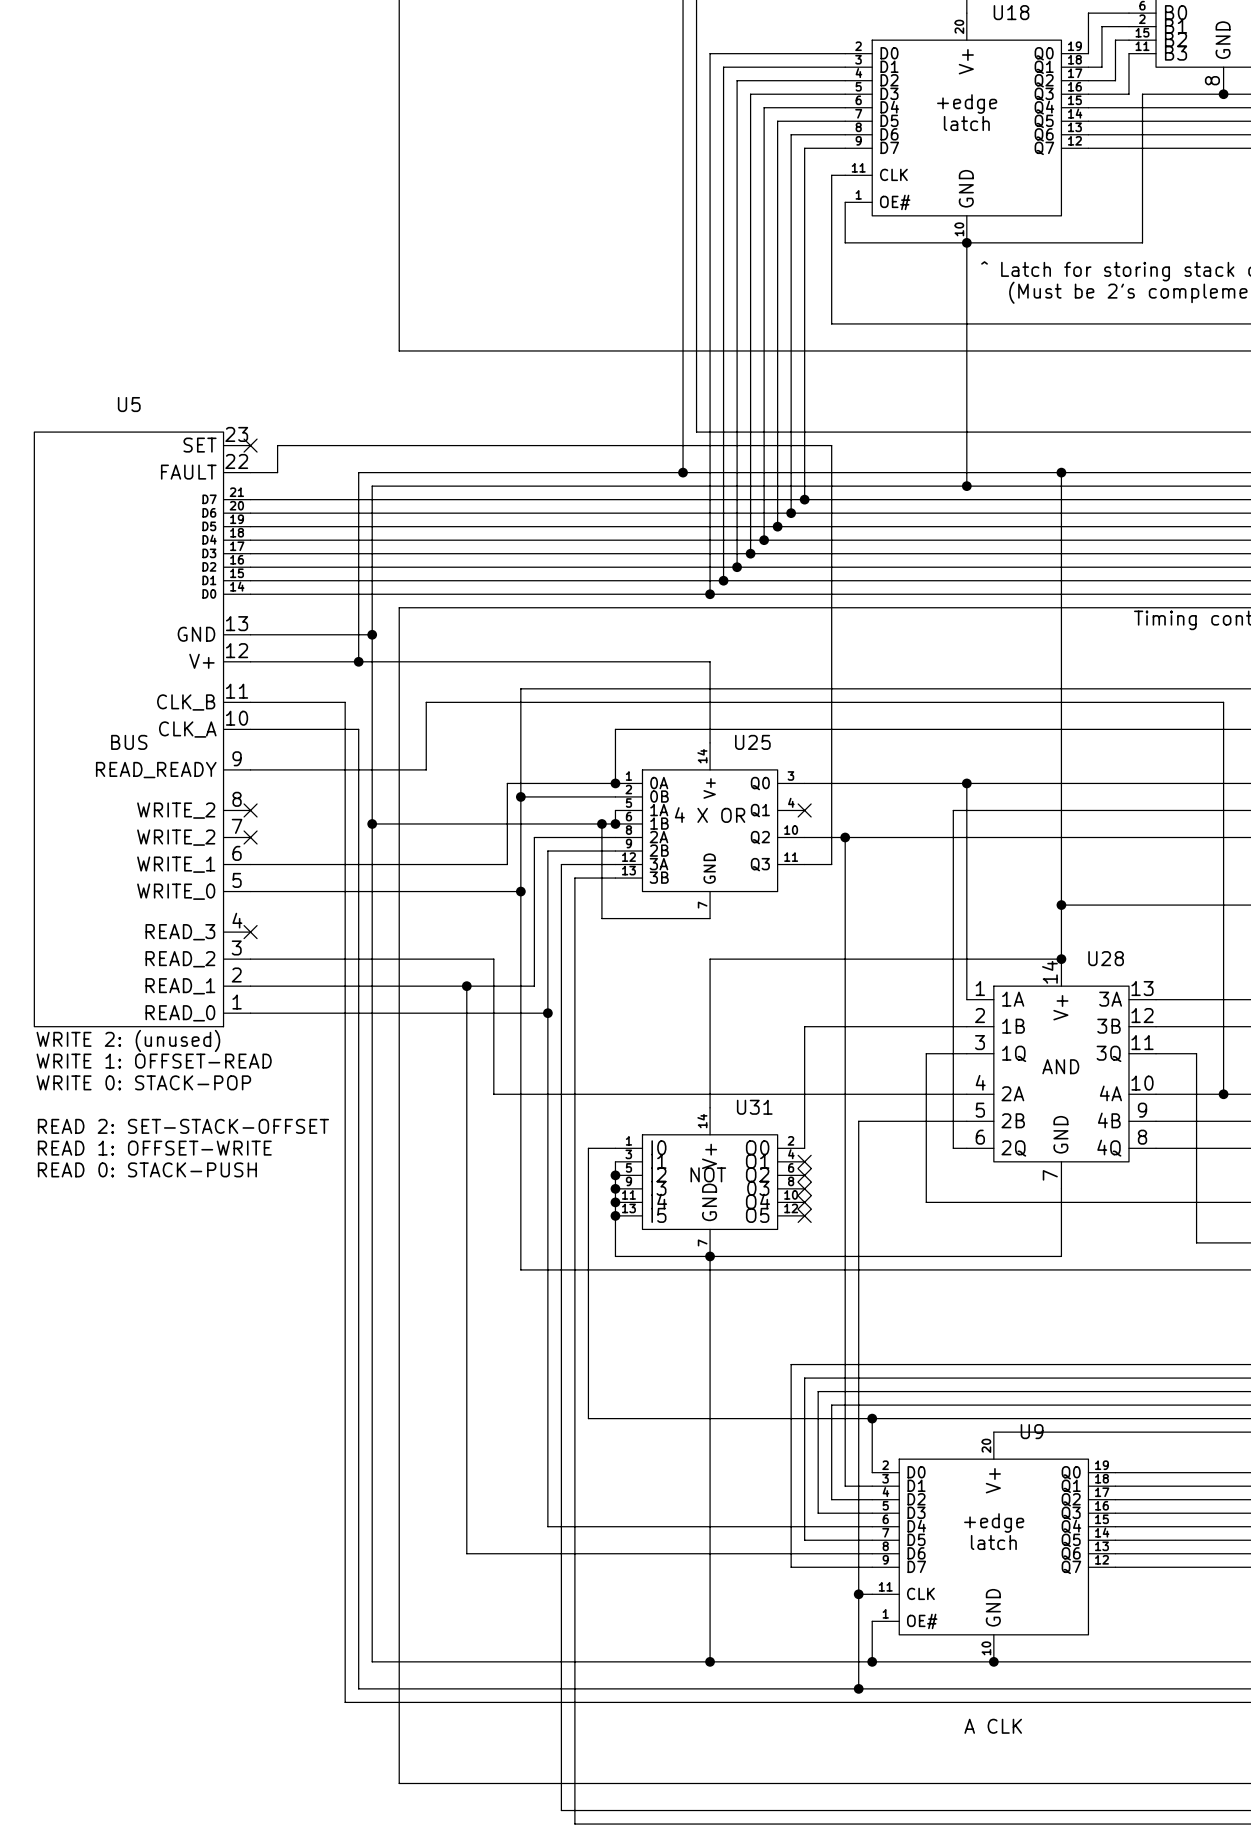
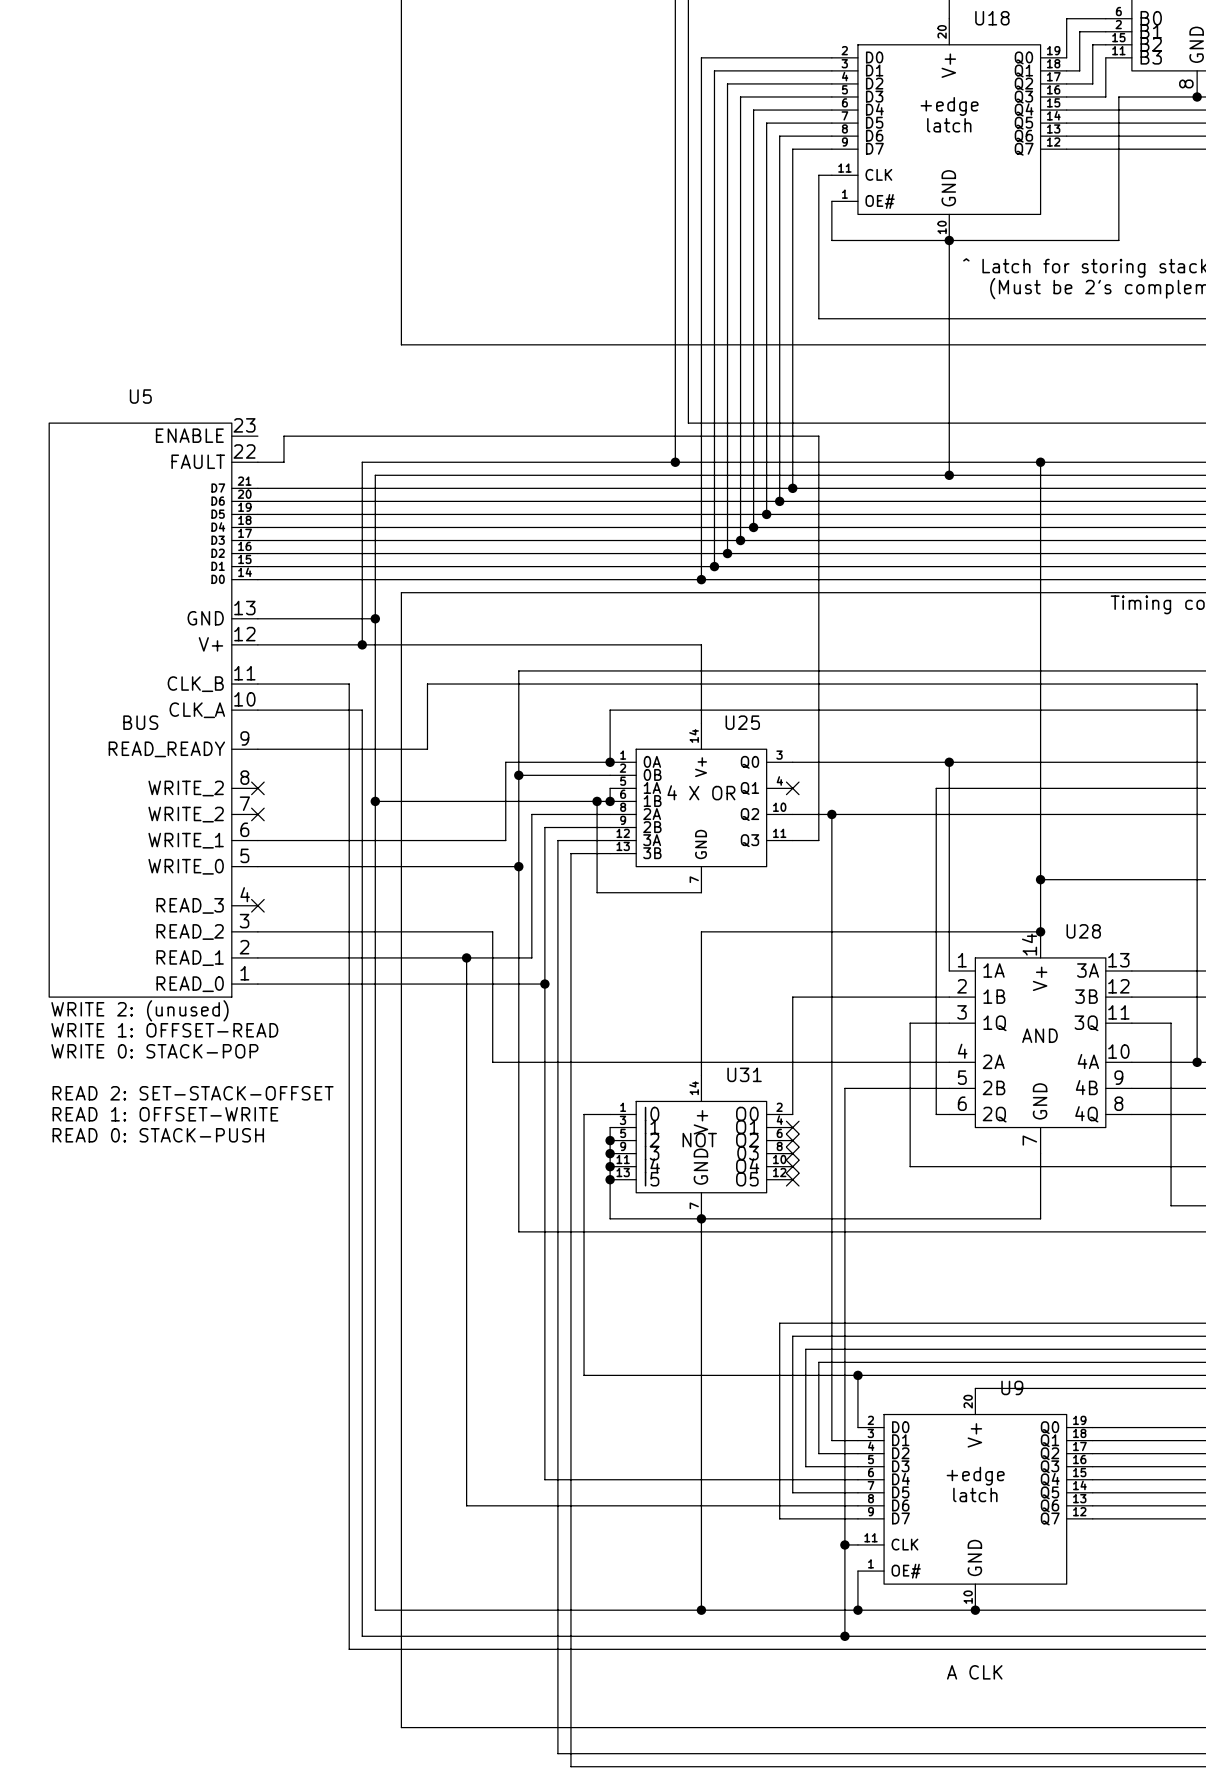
U5 pin name: SET (200, 445) -> ENABLE (189, 435)
no-connect mark: (250, 445) -> none

